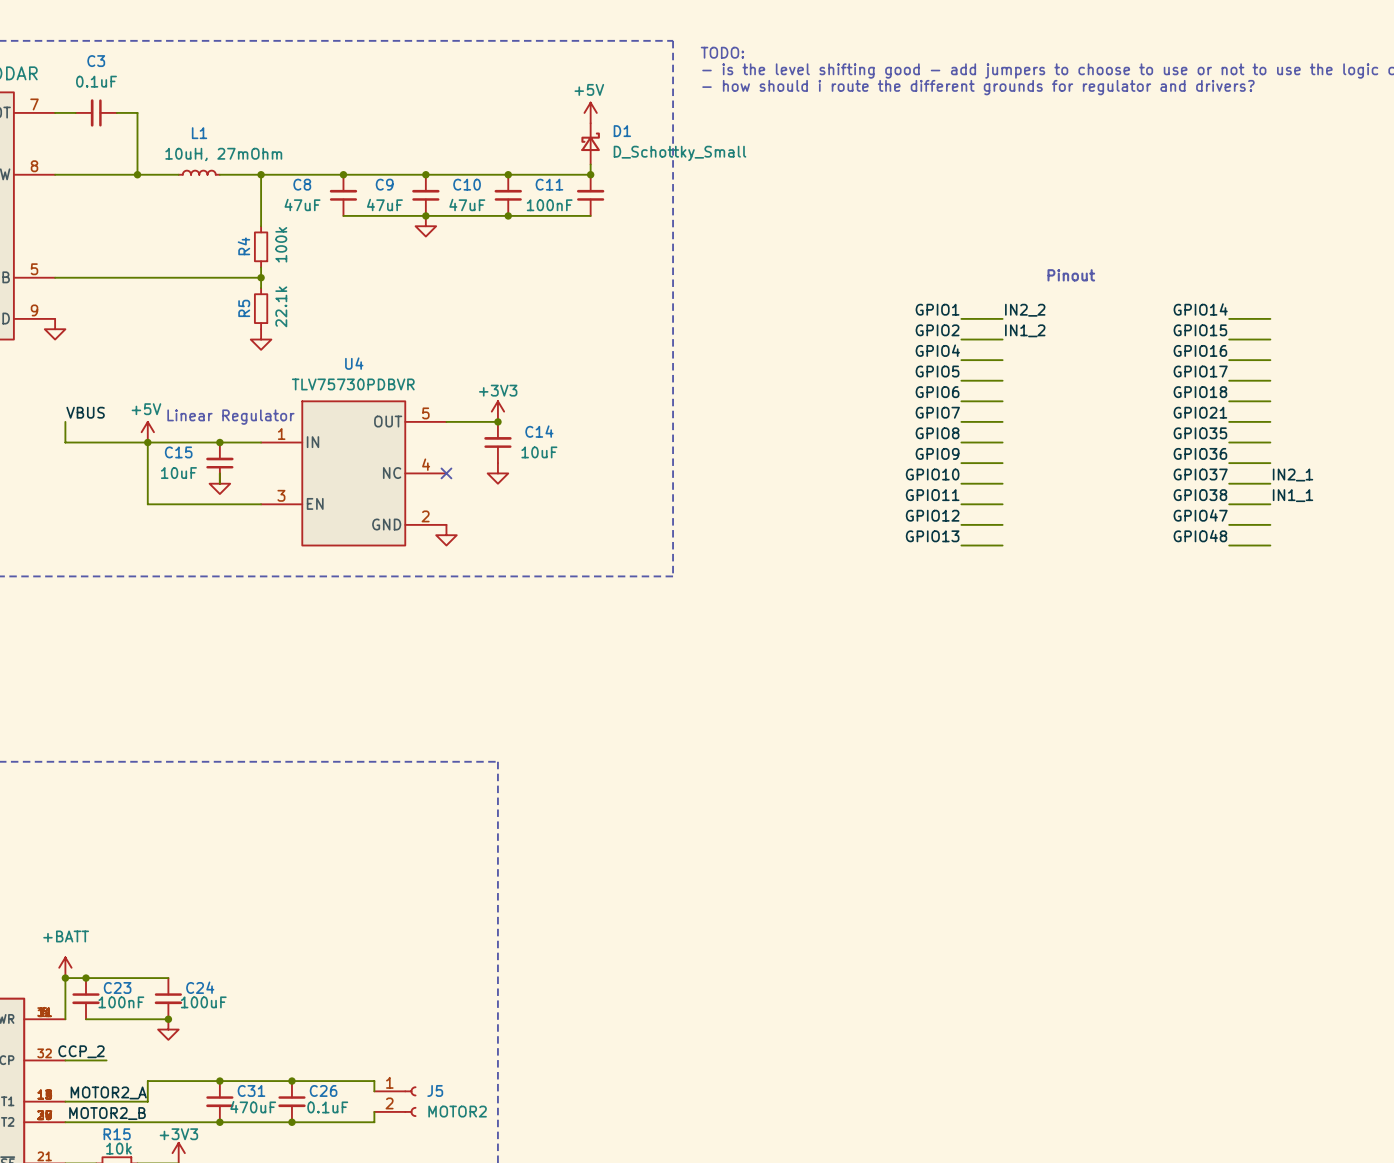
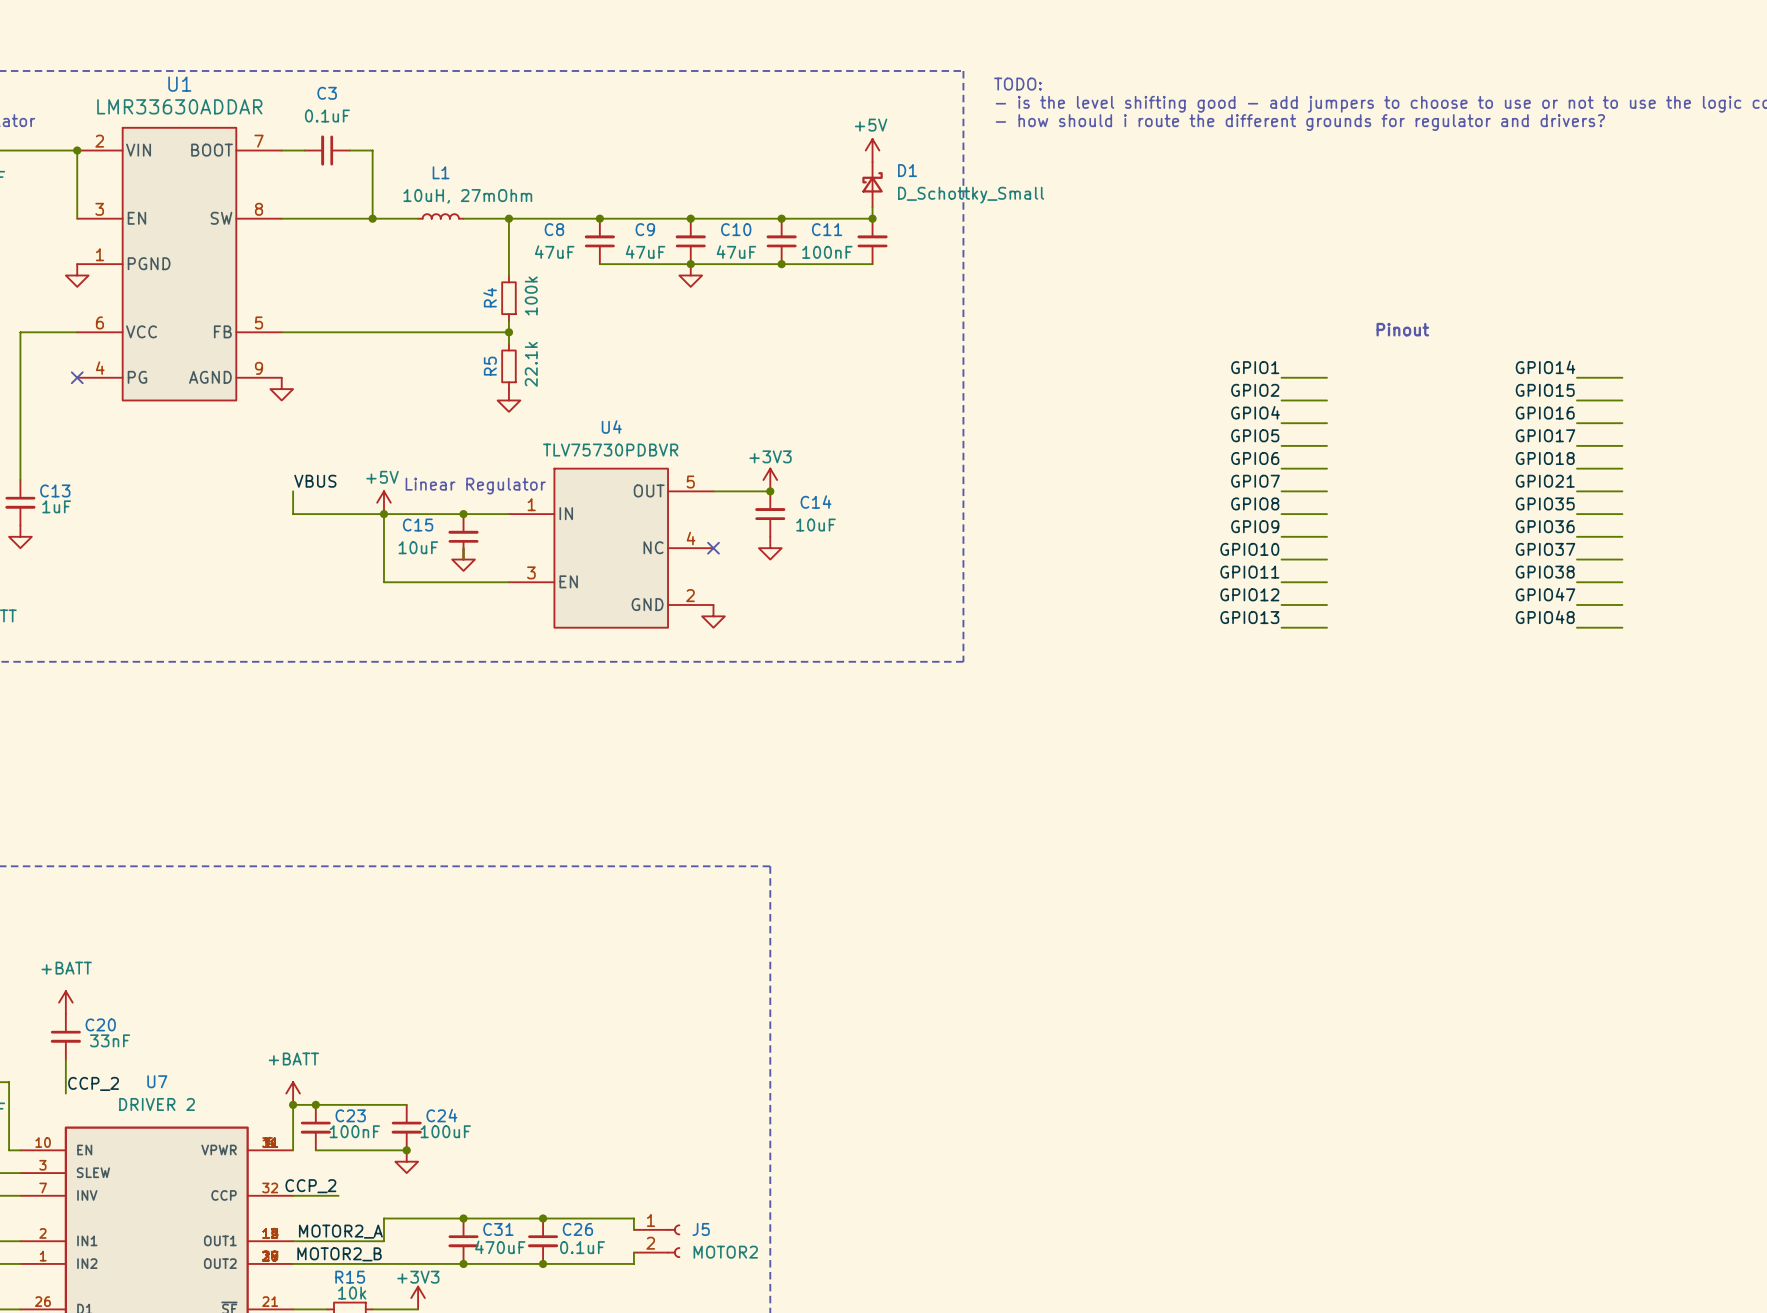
label: IN2_2 (1025, 310) -> none
label: IN1_2 (1025, 330) -> none
label: IN2_1 (1293, 475) -> none
label: IN1_1 (1293, 495) -> none

